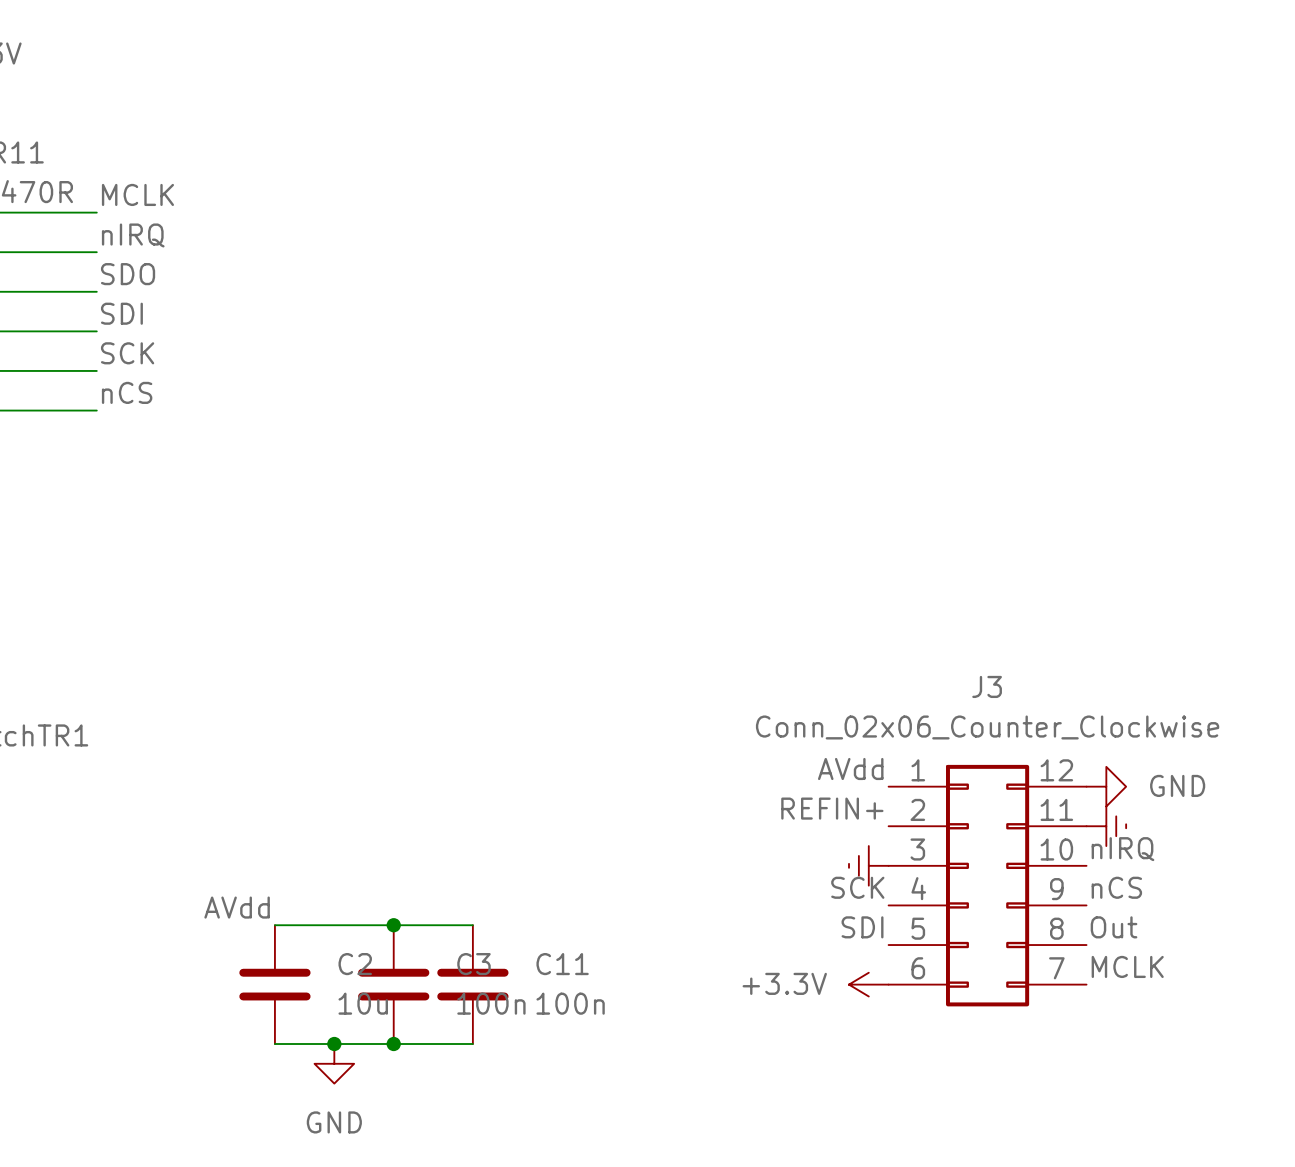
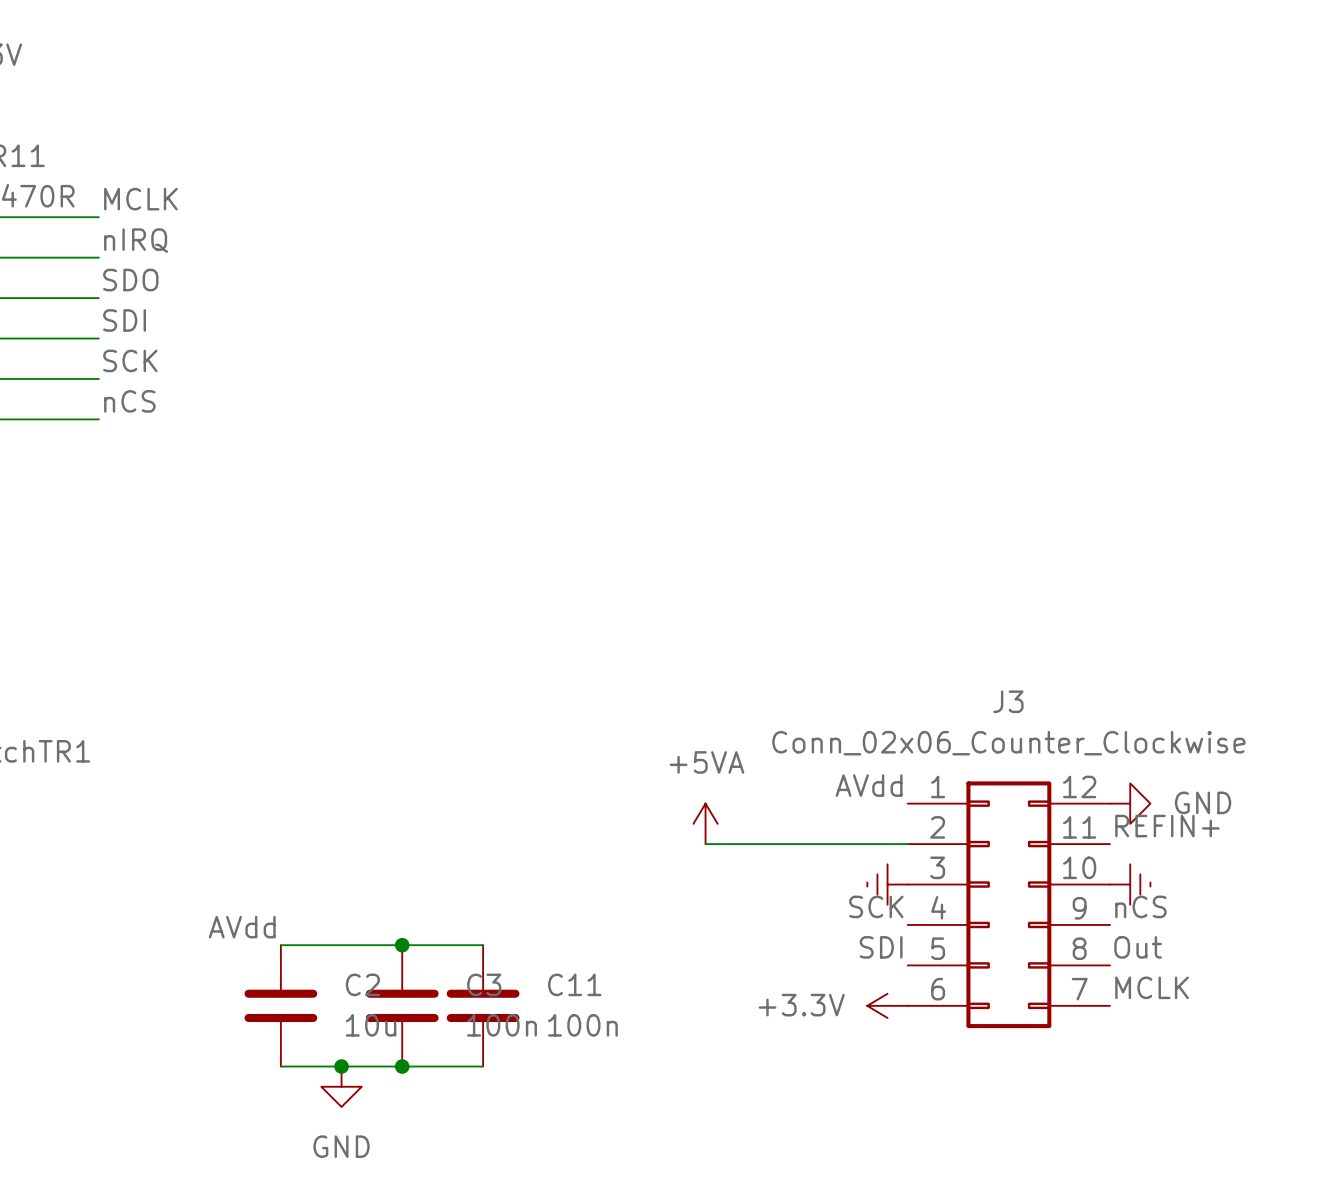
power symbol: none -> +5VA (705, 823)
label position: REFIN+ (832, 808) -> REFIN+ (1167, 826)
wire: none -> (705, 844) (907, 844)
power symbol position: (1106, 826) -> (1130, 884)
label: nIRQ (1122, 849) -> none

